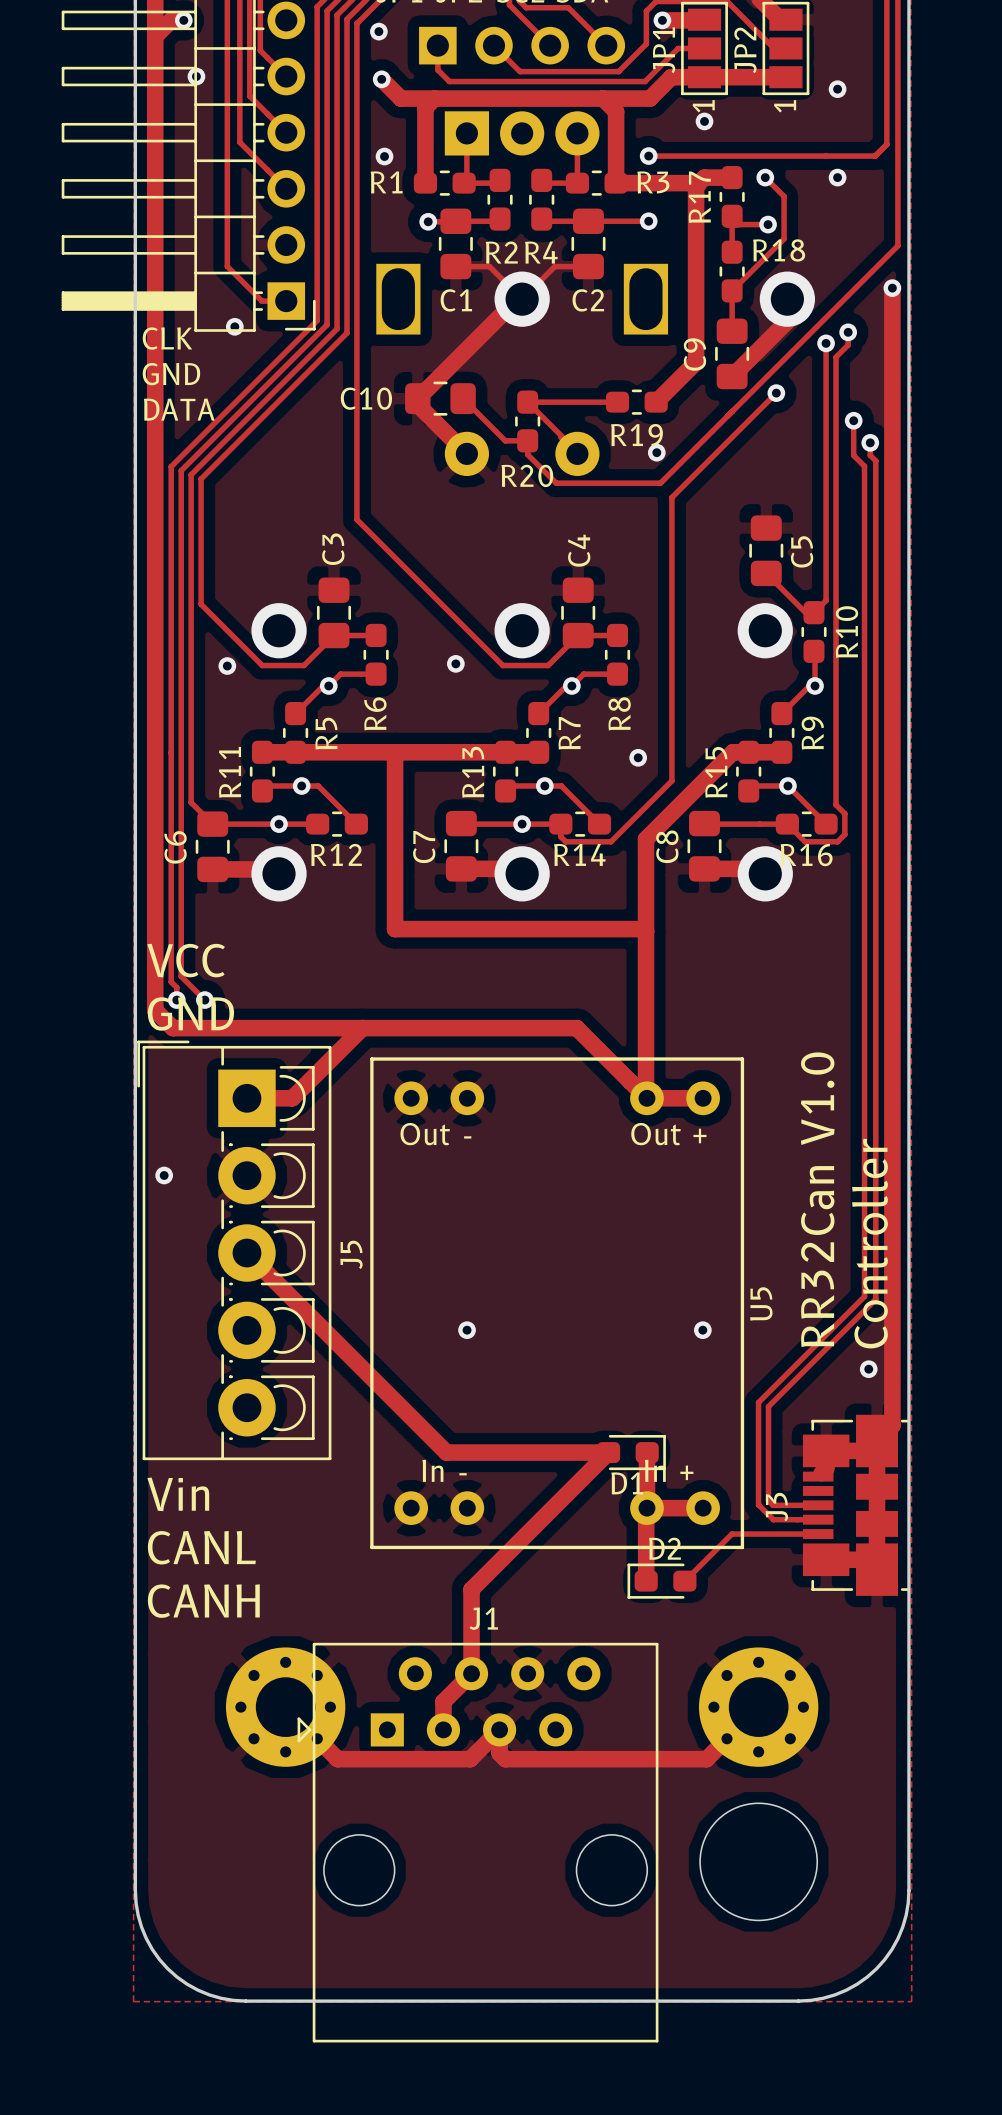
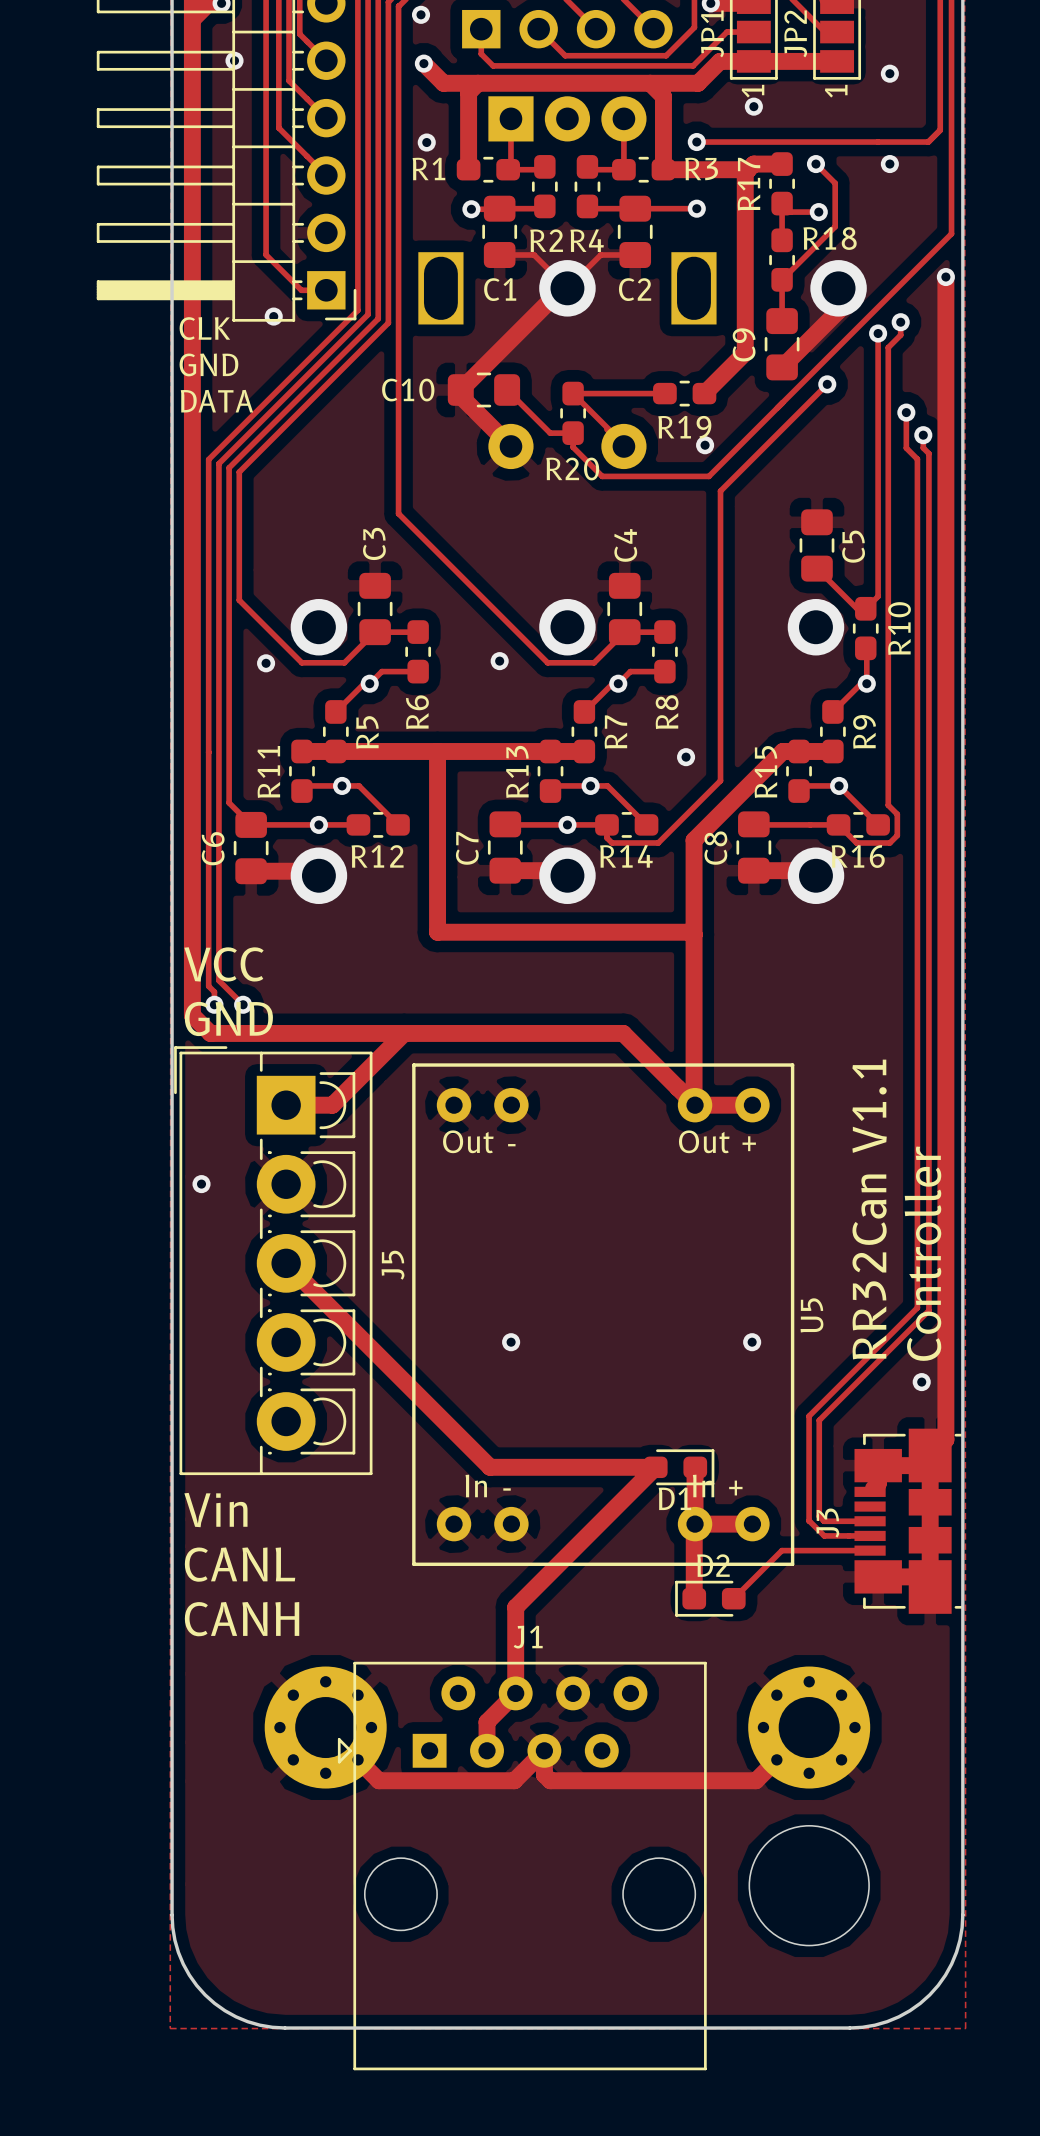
text: RR32Can V1.0 (817, 1199) -> RR32Can V1.1 (869, 1209)

